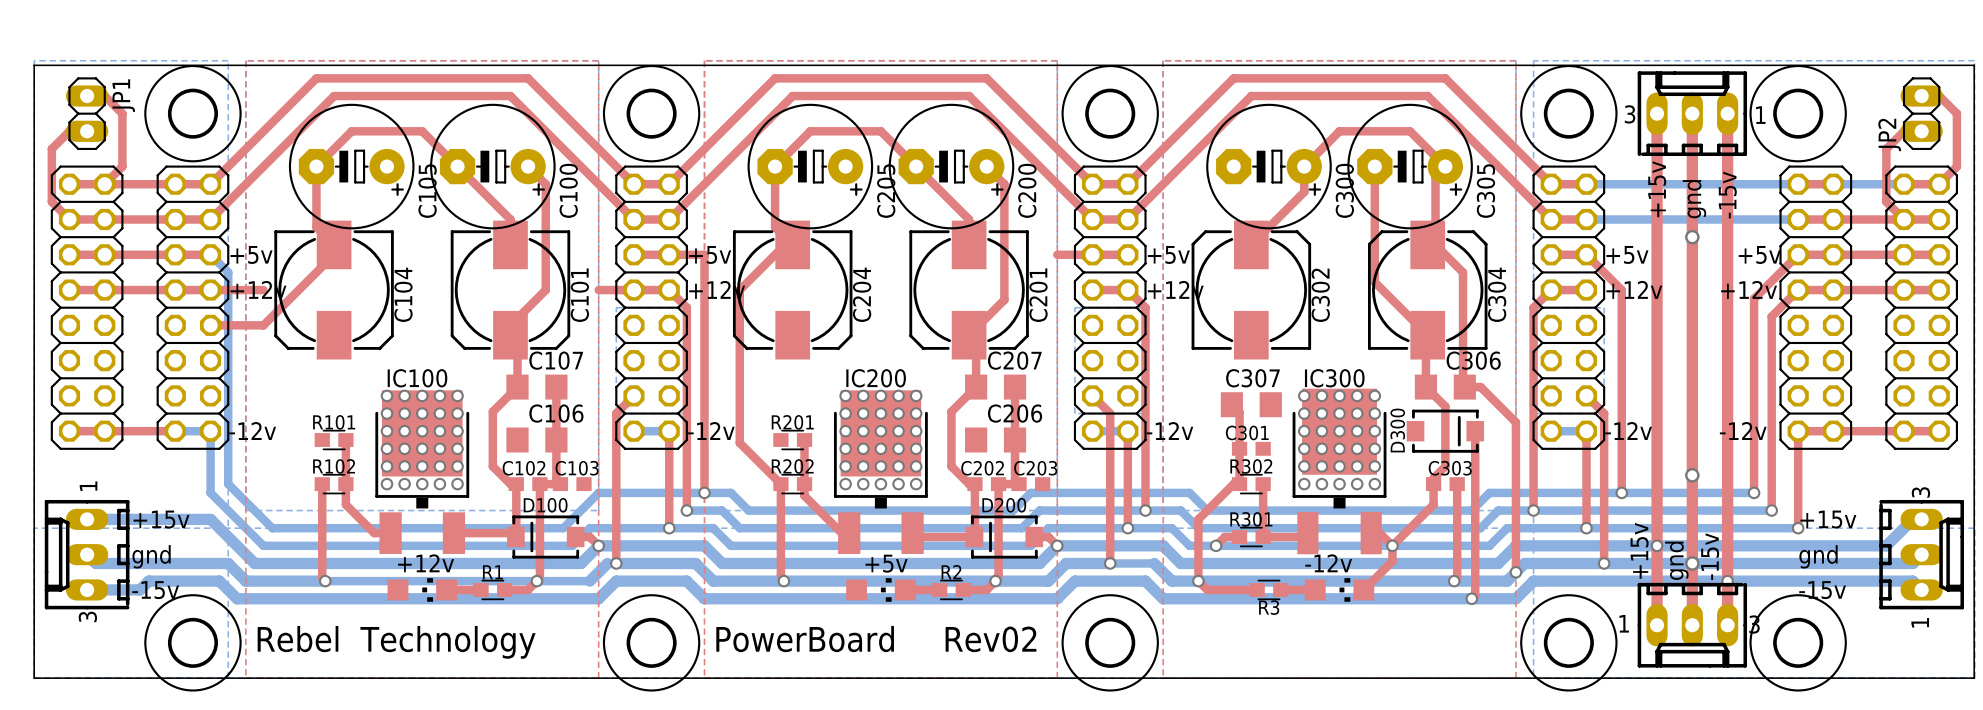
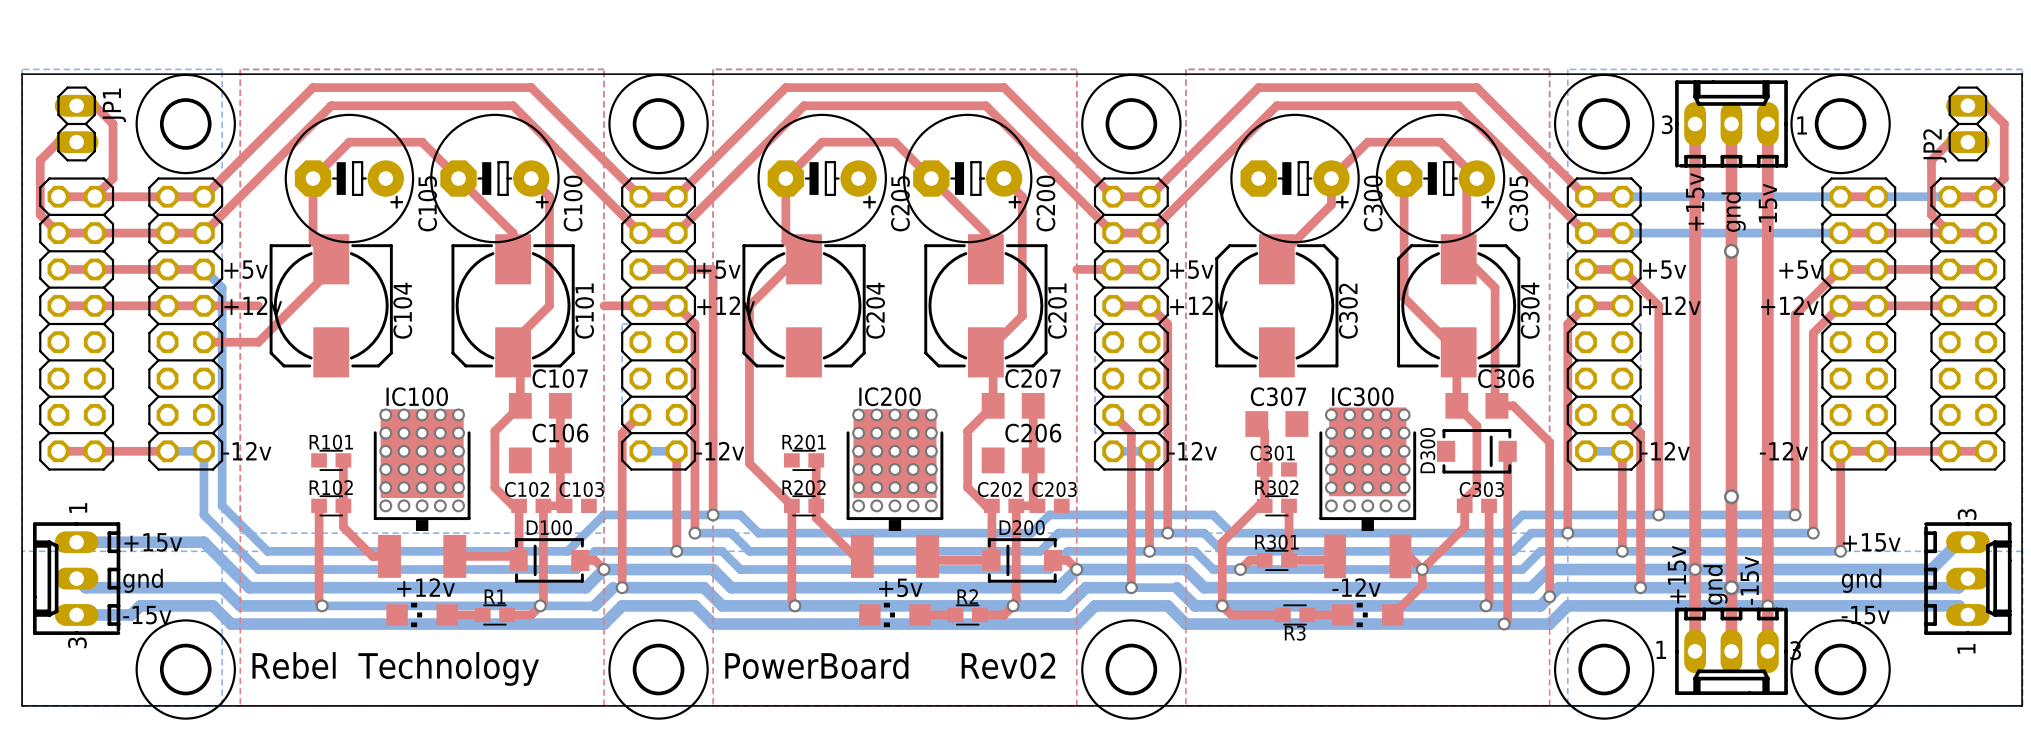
part rotation: 0° (422, 589) -> 180° (422, 614)
part rotation: 0° (880, 589) -> 180° (894, 614)
part rotation: 0° (1339, 589) -> 180° (1367, 614)

